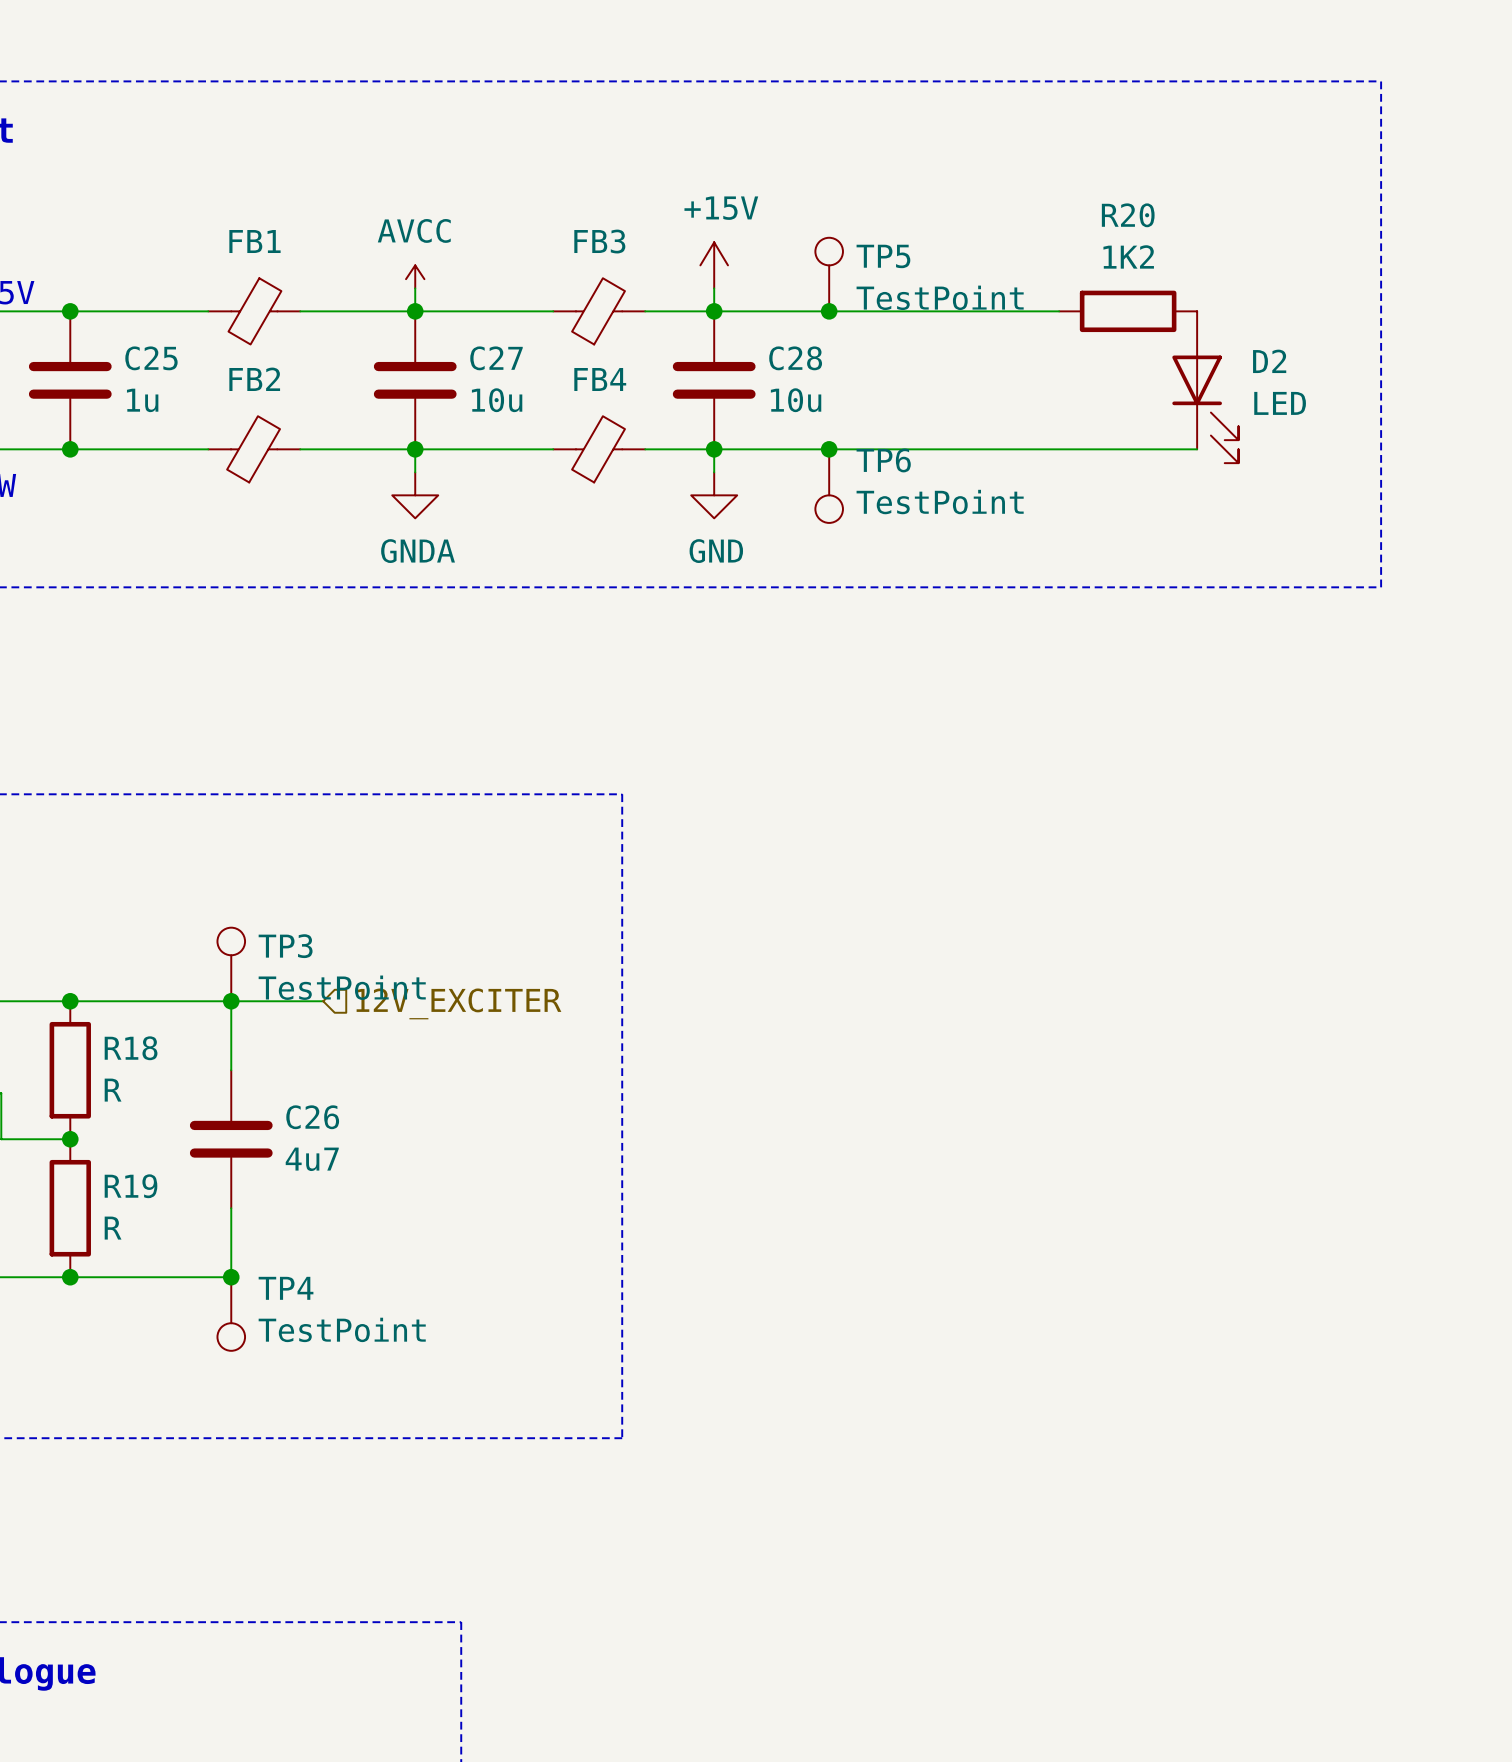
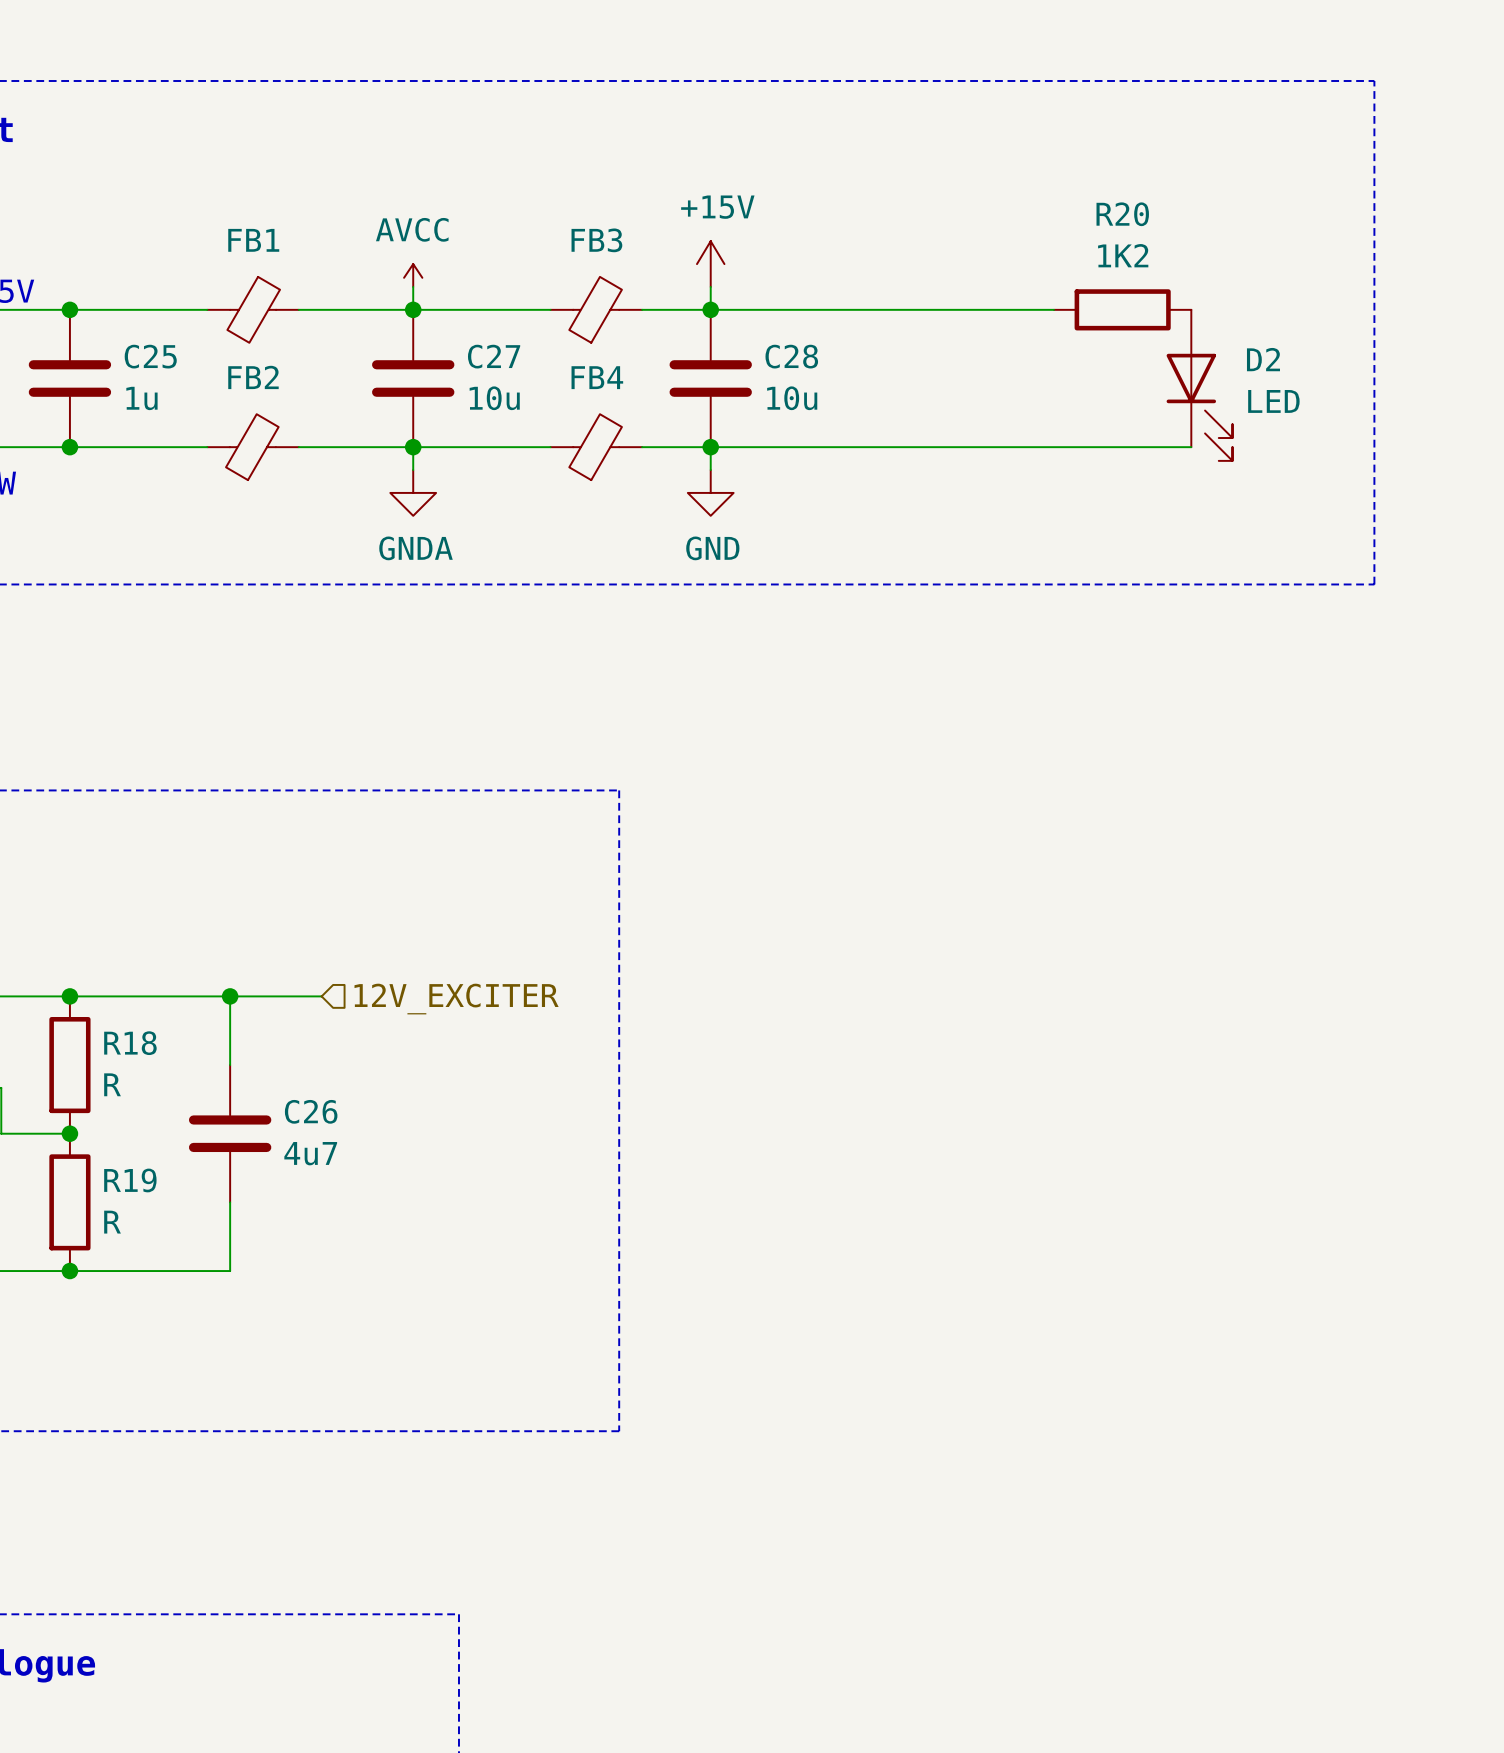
TP5: TestPoint (829, 274) -> none
junction: (829, 311) -> none
junction: (829, 449) -> none
TP6: TestPoint (829, 486) -> none
TP3: TestPoint (231, 964) -> none
junction: (231, 1277) -> none
TP4: TestPoint (231, 1314) -> none

